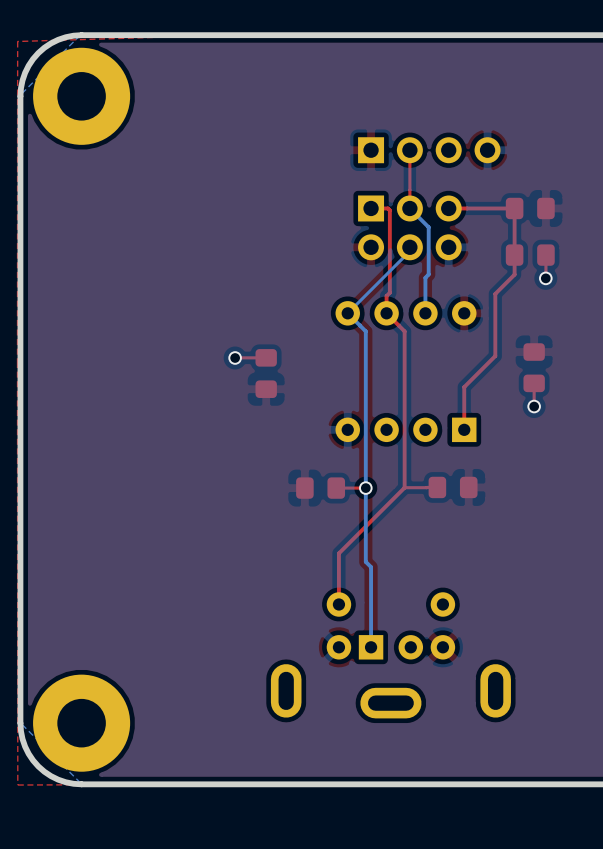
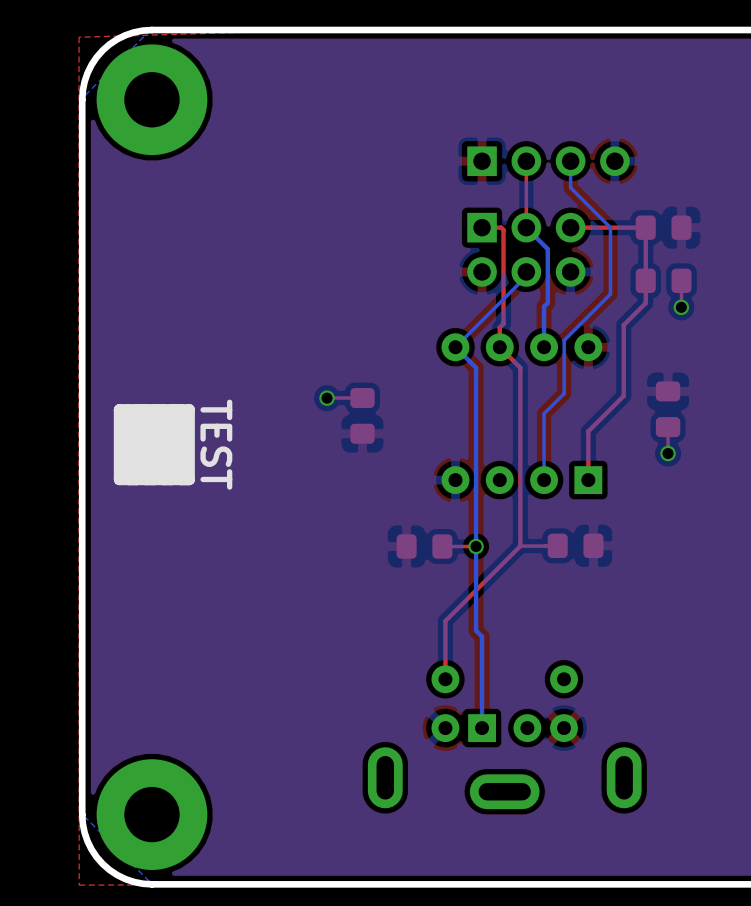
bottom track: none -> (570, 161) (570, 187) (610, 227) (610, 294) (564, 340) (564, 393) (544, 413) (544, 480)
TEST: none -> (154, 444)

